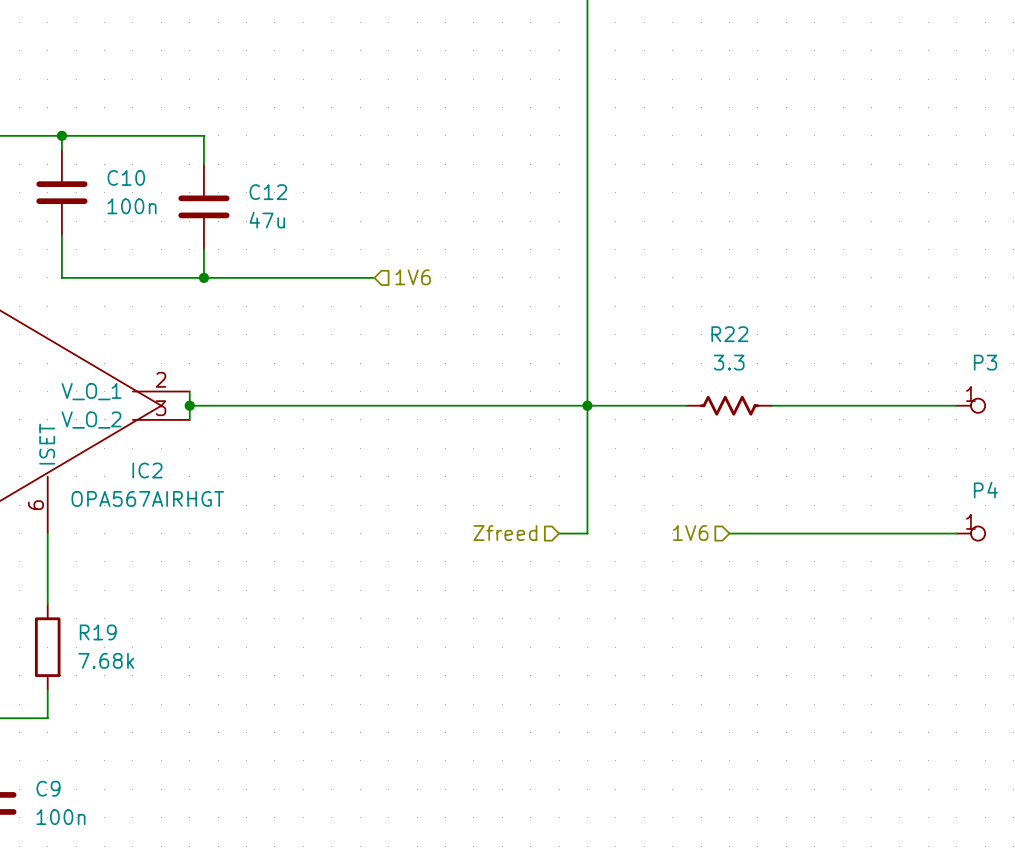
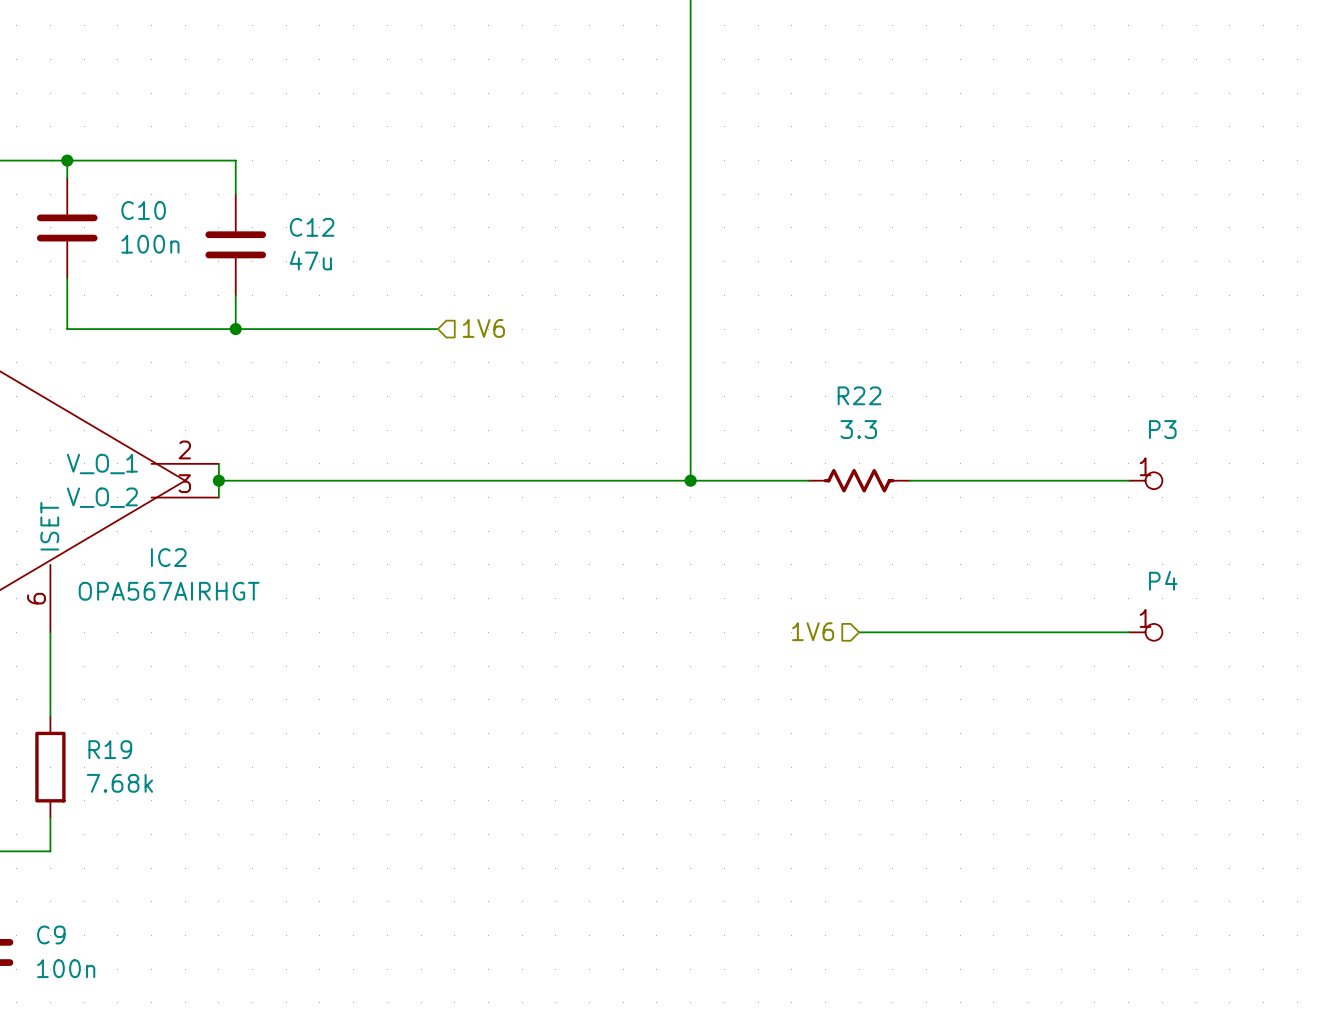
wire: (587, 405) (587, 533) (559, 533) -> none
hierarchical label: Zfreed (505, 533) -> none

